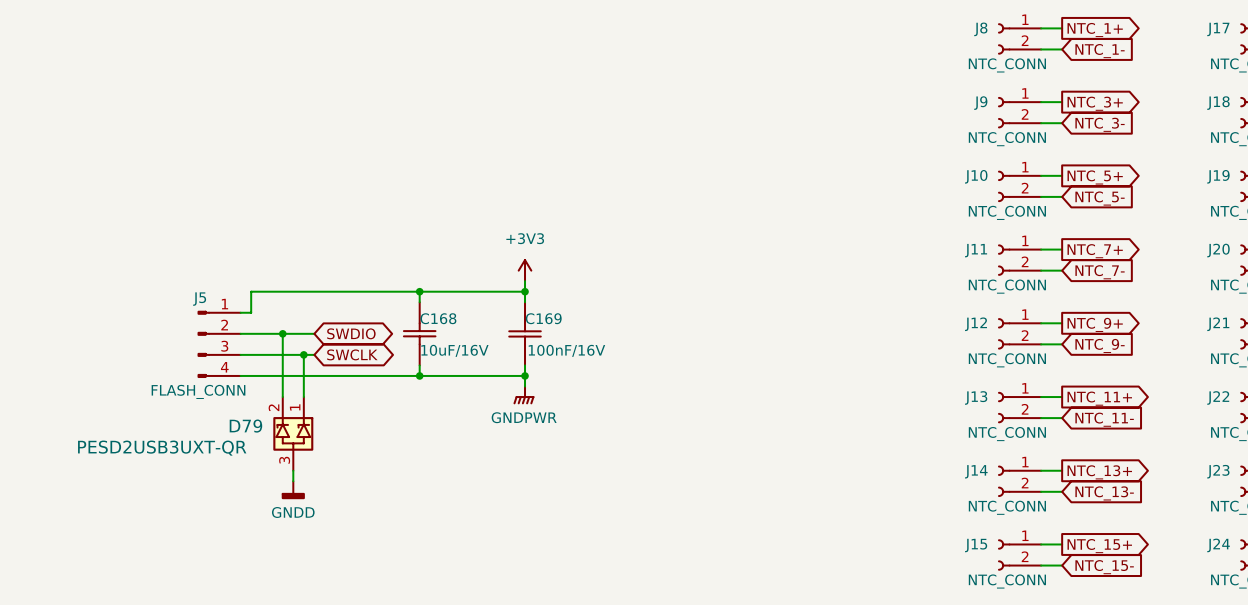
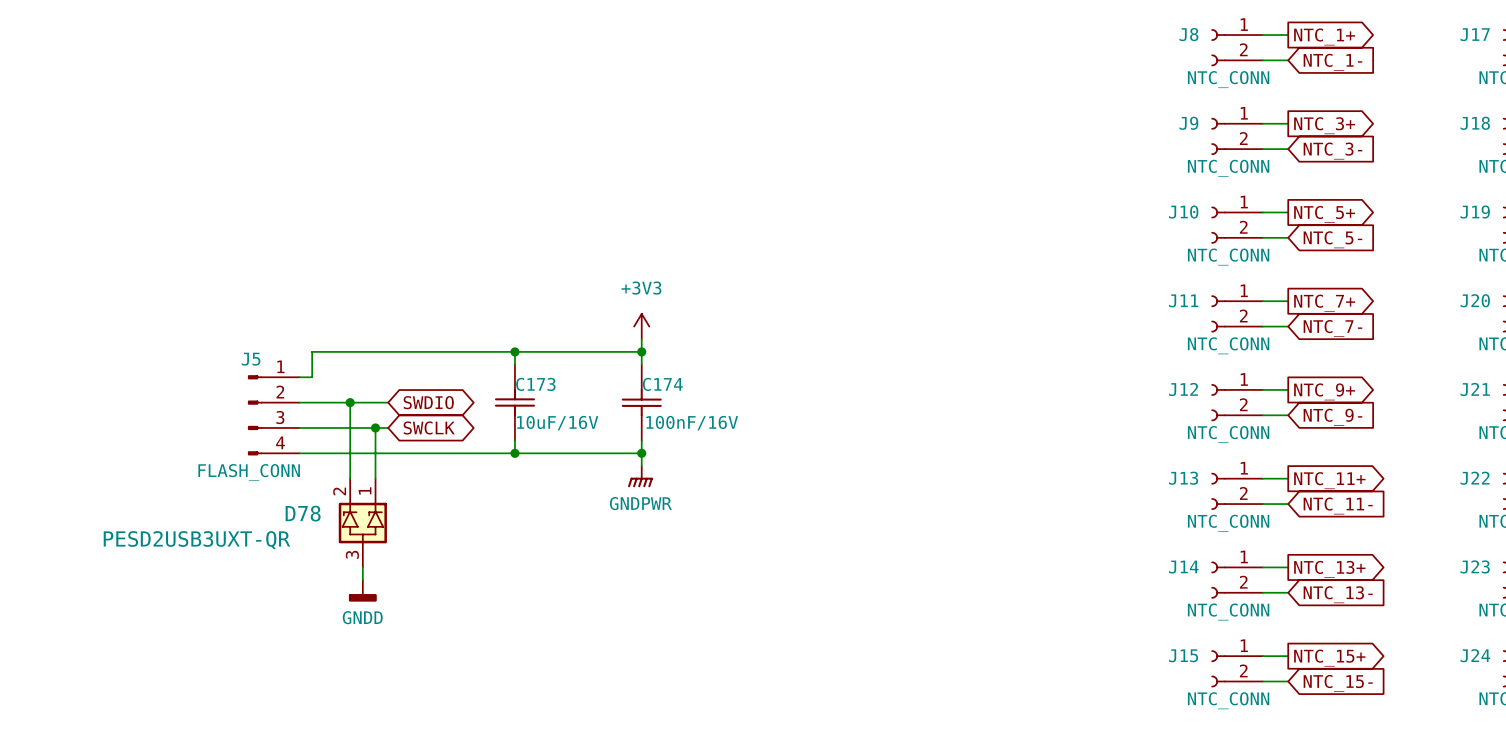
C168 name: C168 (438, 318) -> C173 (535, 384)
C169 name: C169 (543, 318) -> C174 (662, 384)
D79 name: D79 (245, 426) -> D78 (303, 513)

